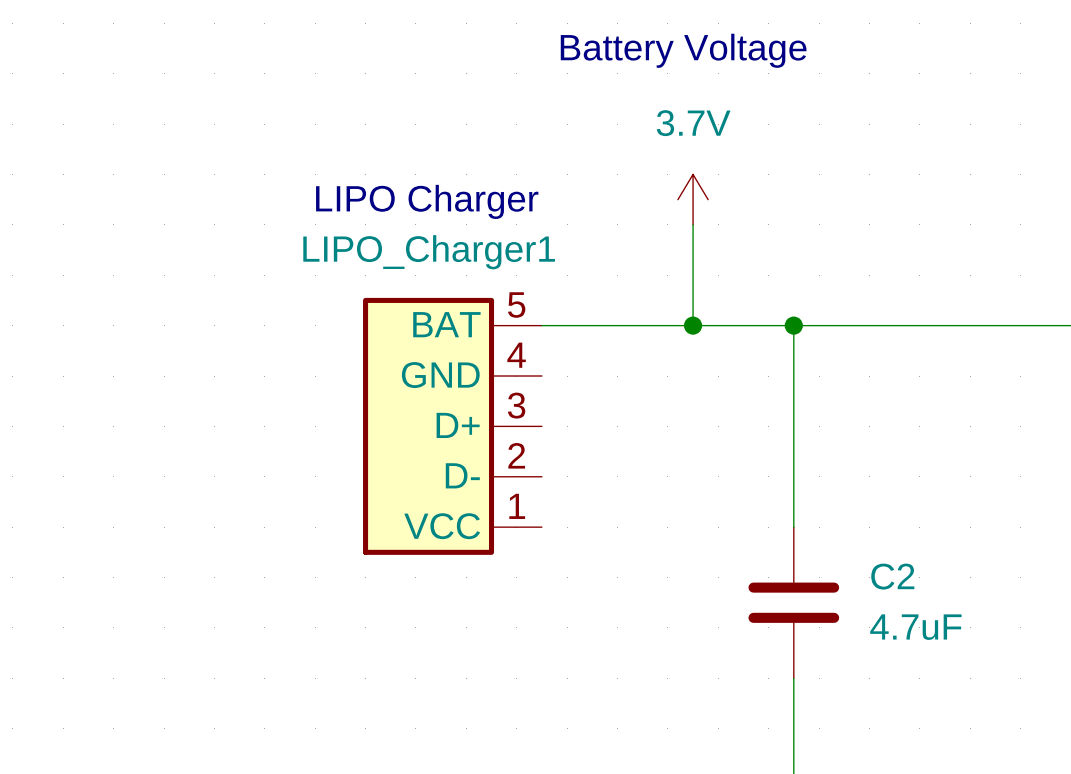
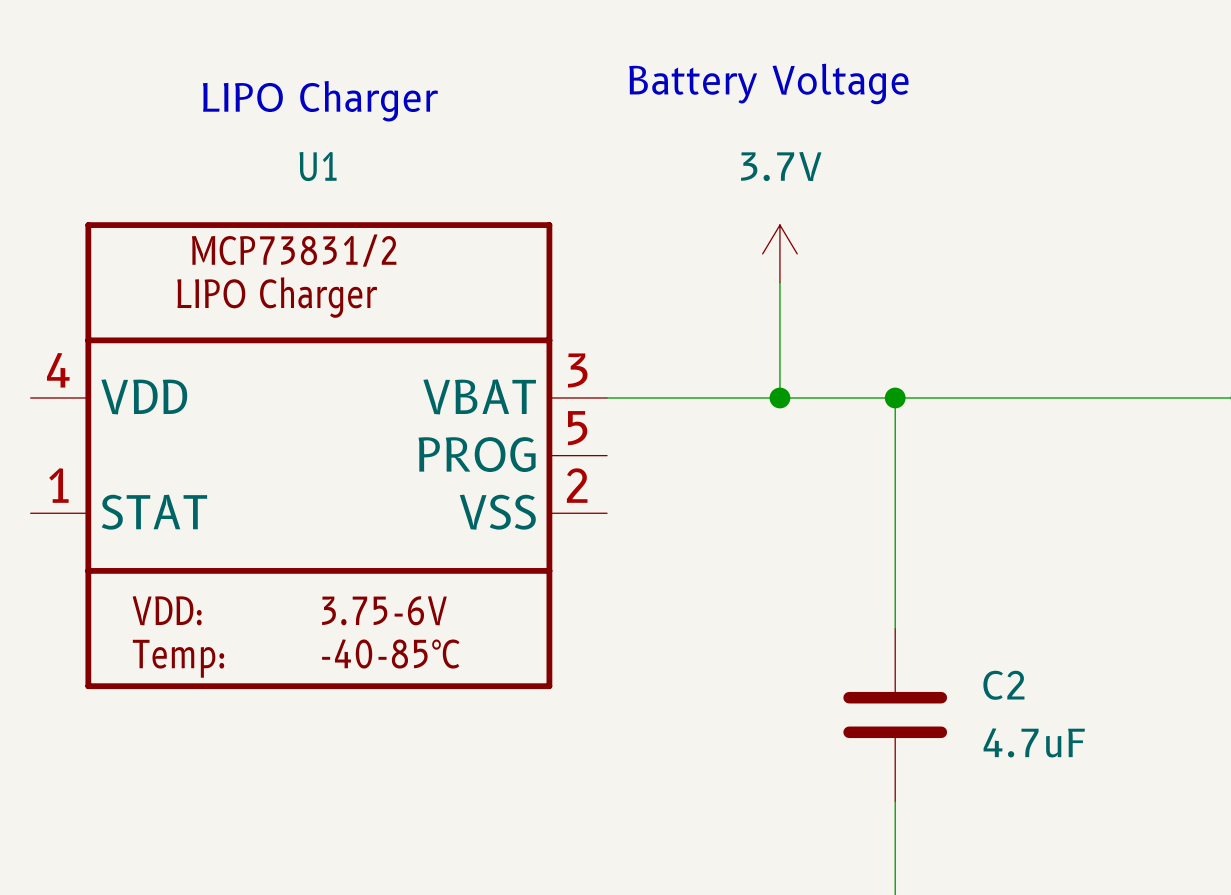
text position: LIPO Charger (427, 201) -> LIPO Charger (320, 101)
U1: none -> (318, 455)
LIPO_Charger1: (452, 426) -> none

